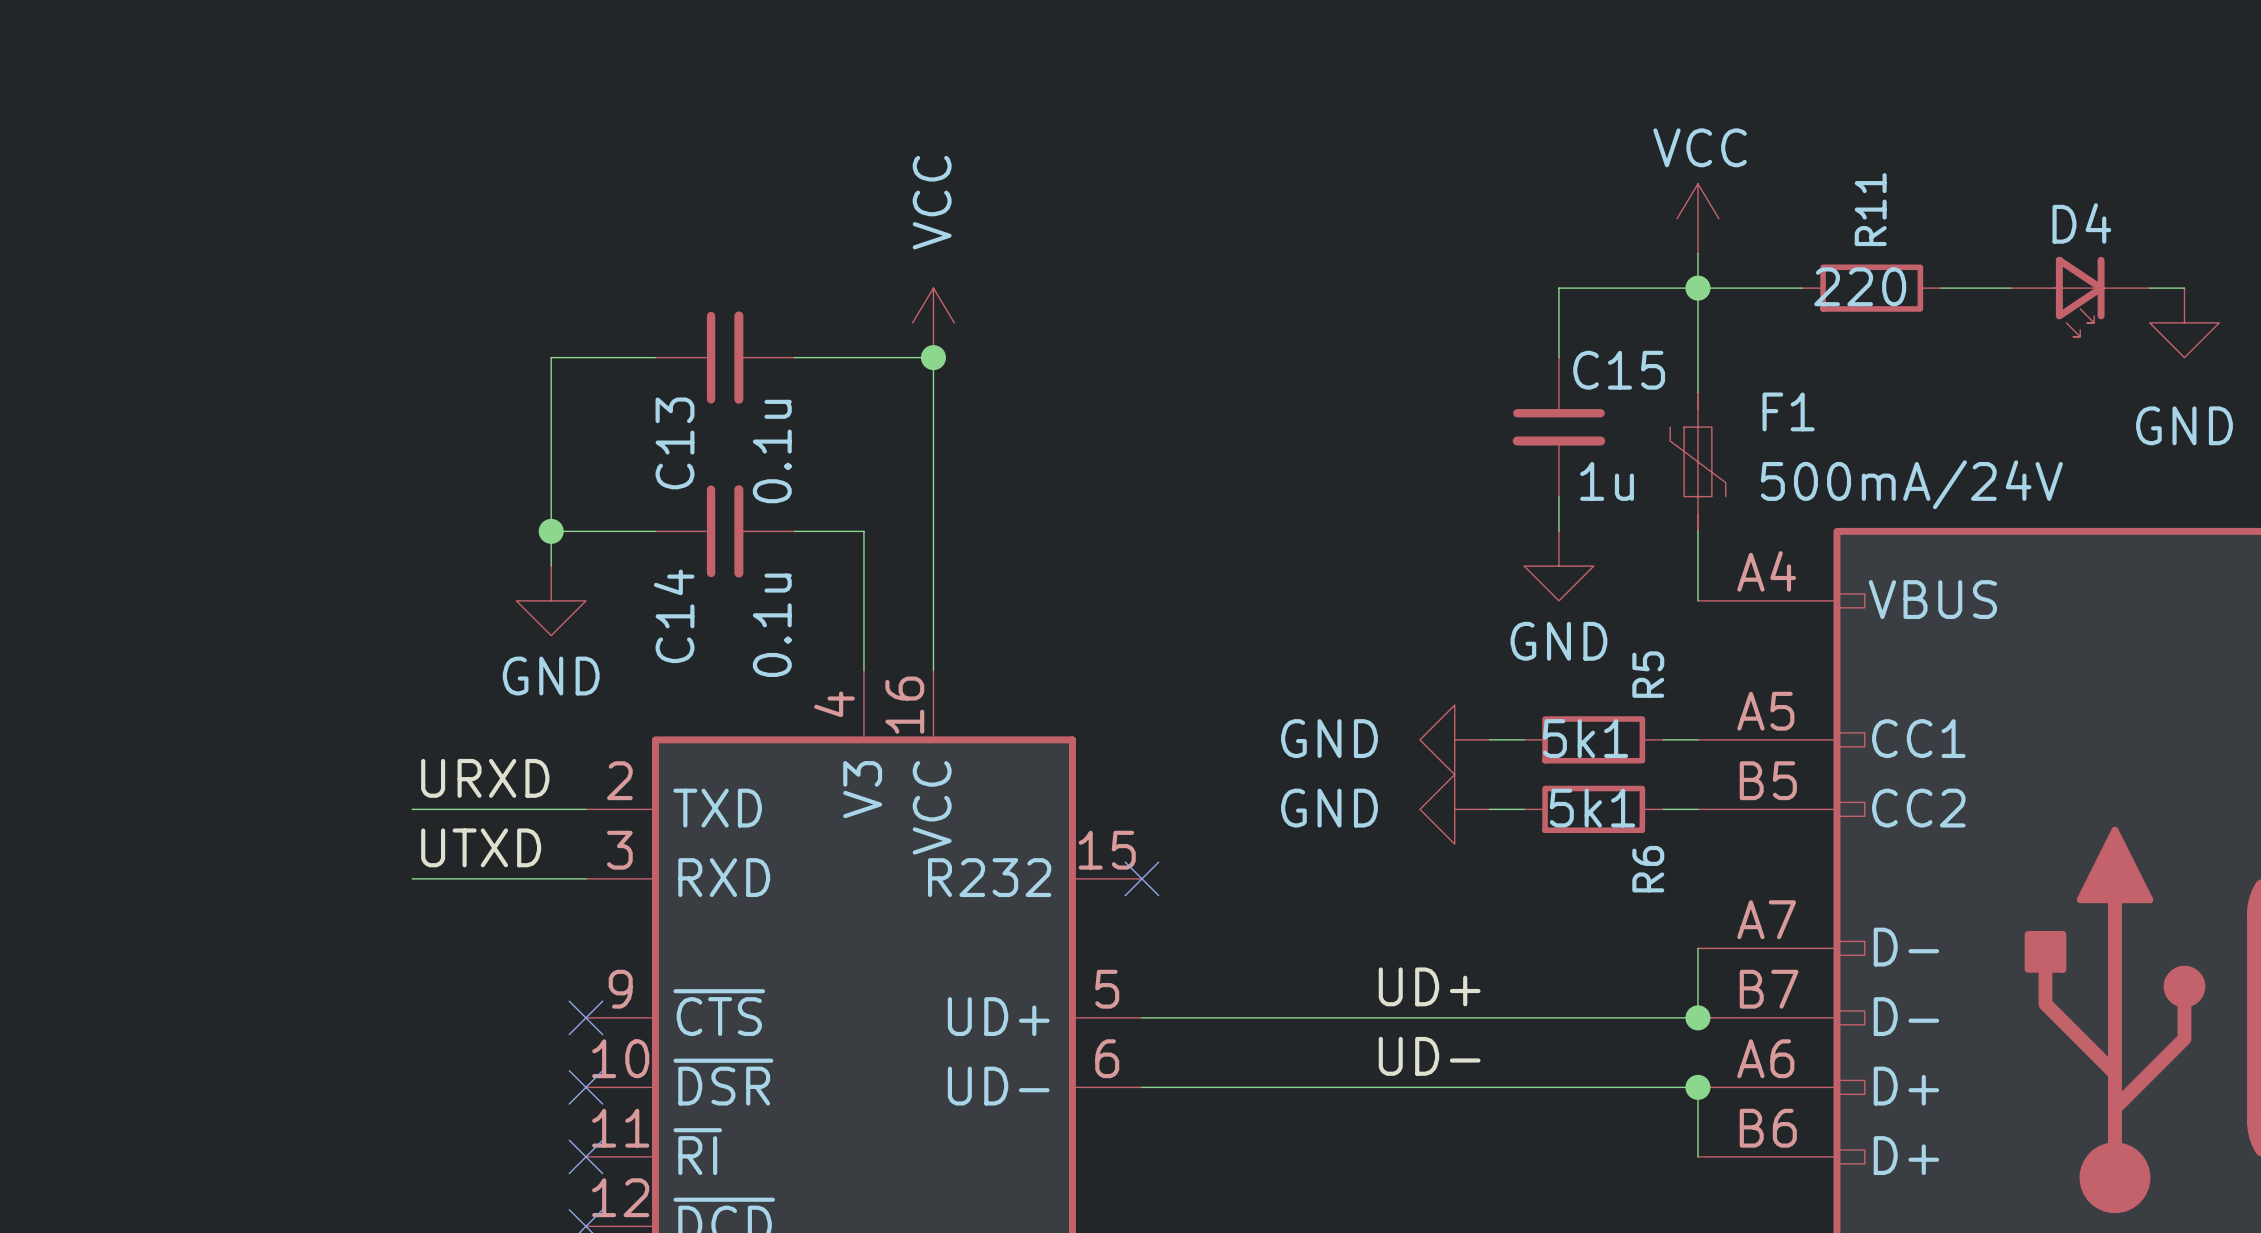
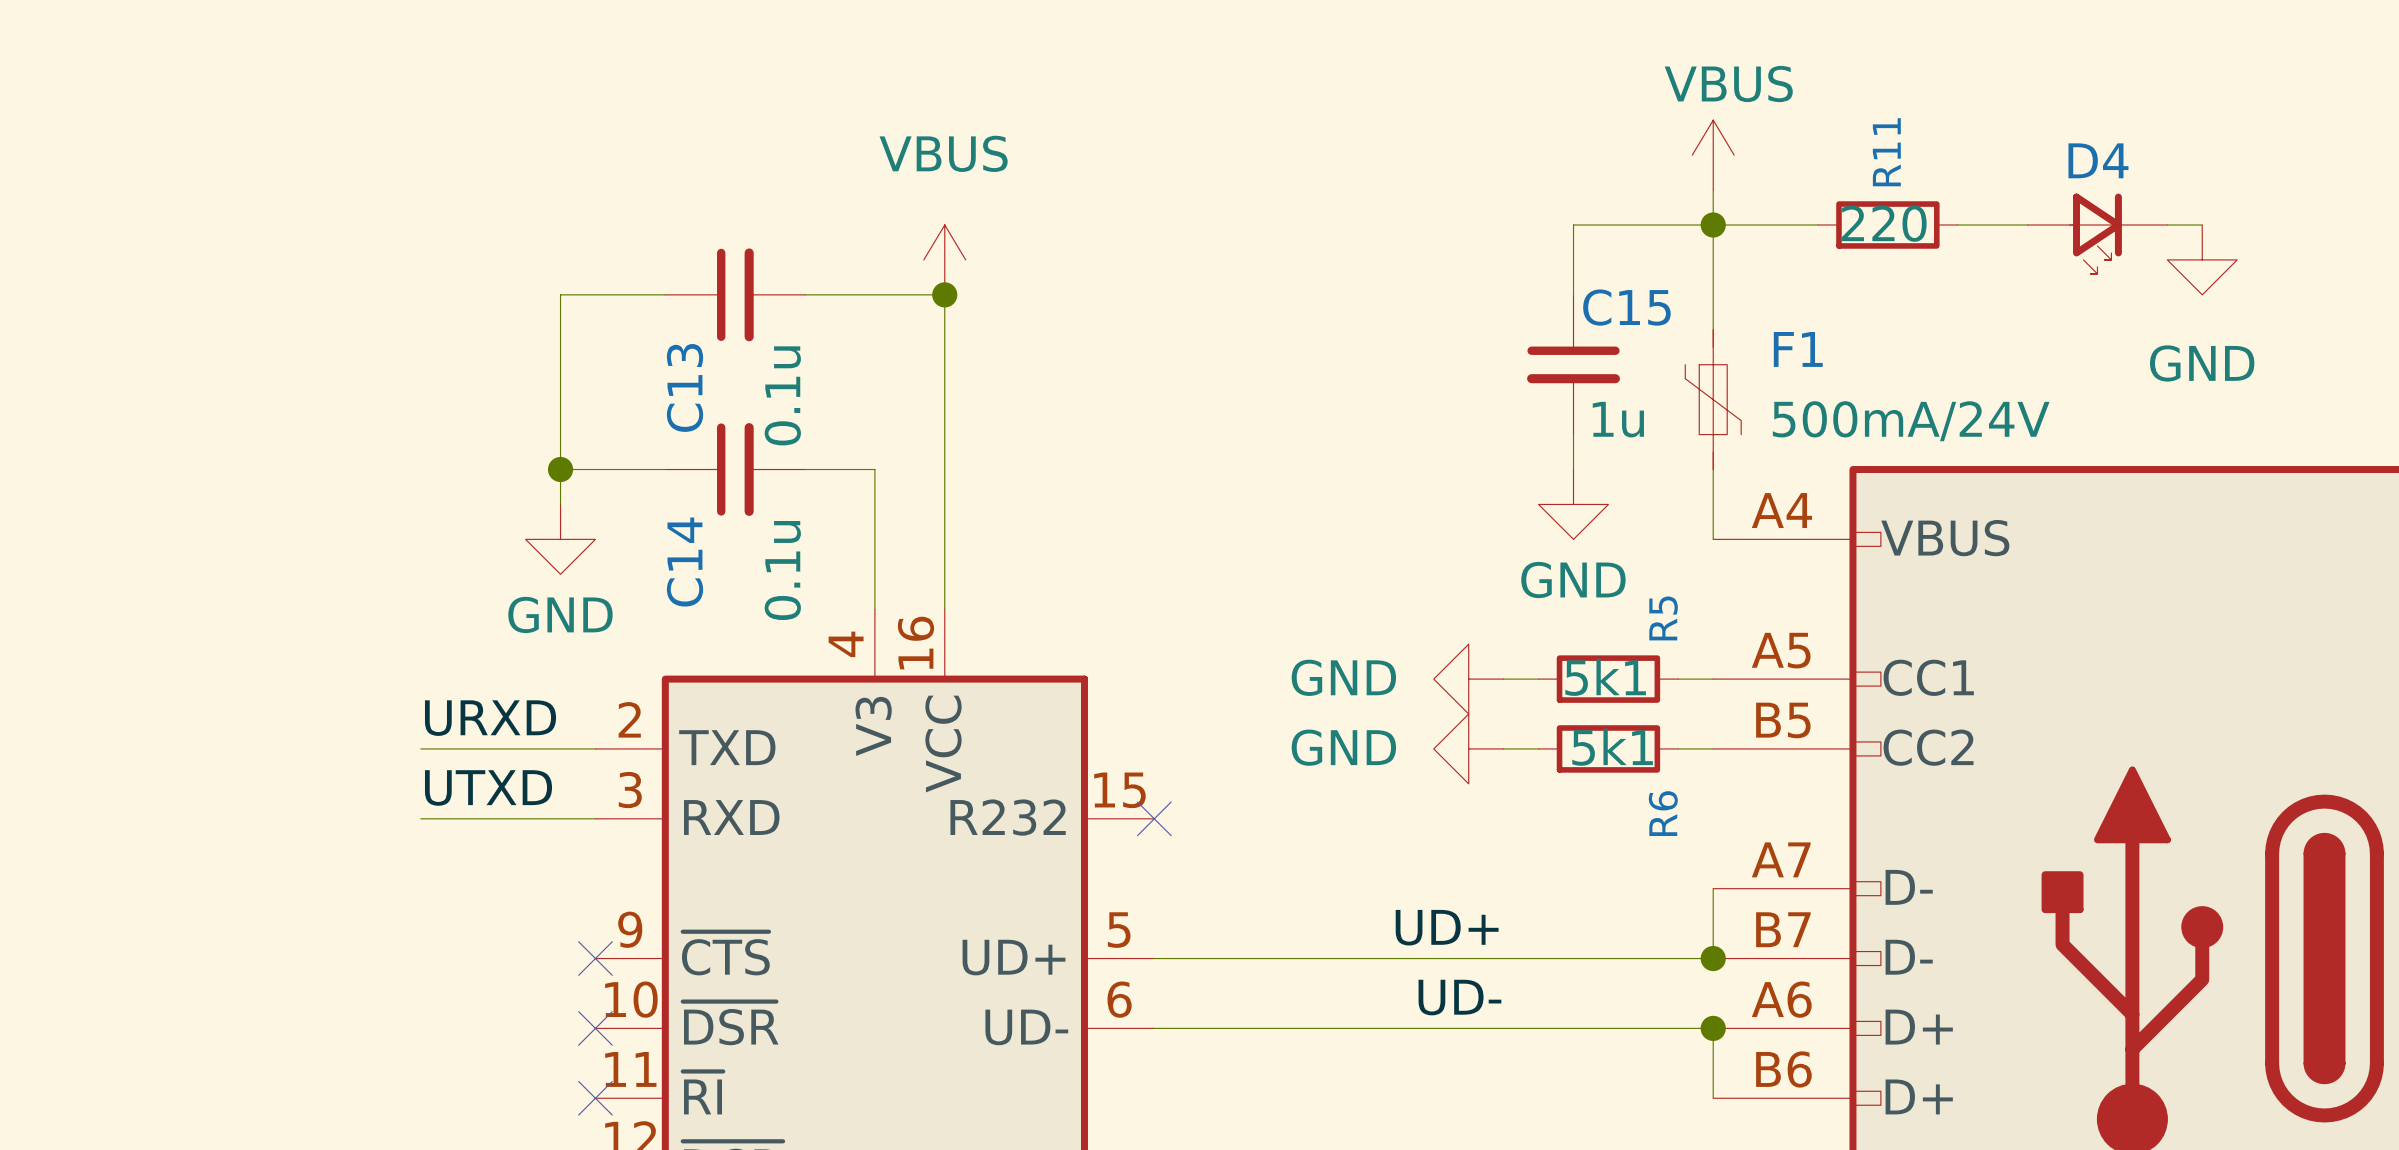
power symbol: VCC (1697, 218) -> VBUS (1713, 155)
power symbol: VCC (933, 322) -> VBUS (944, 259)

